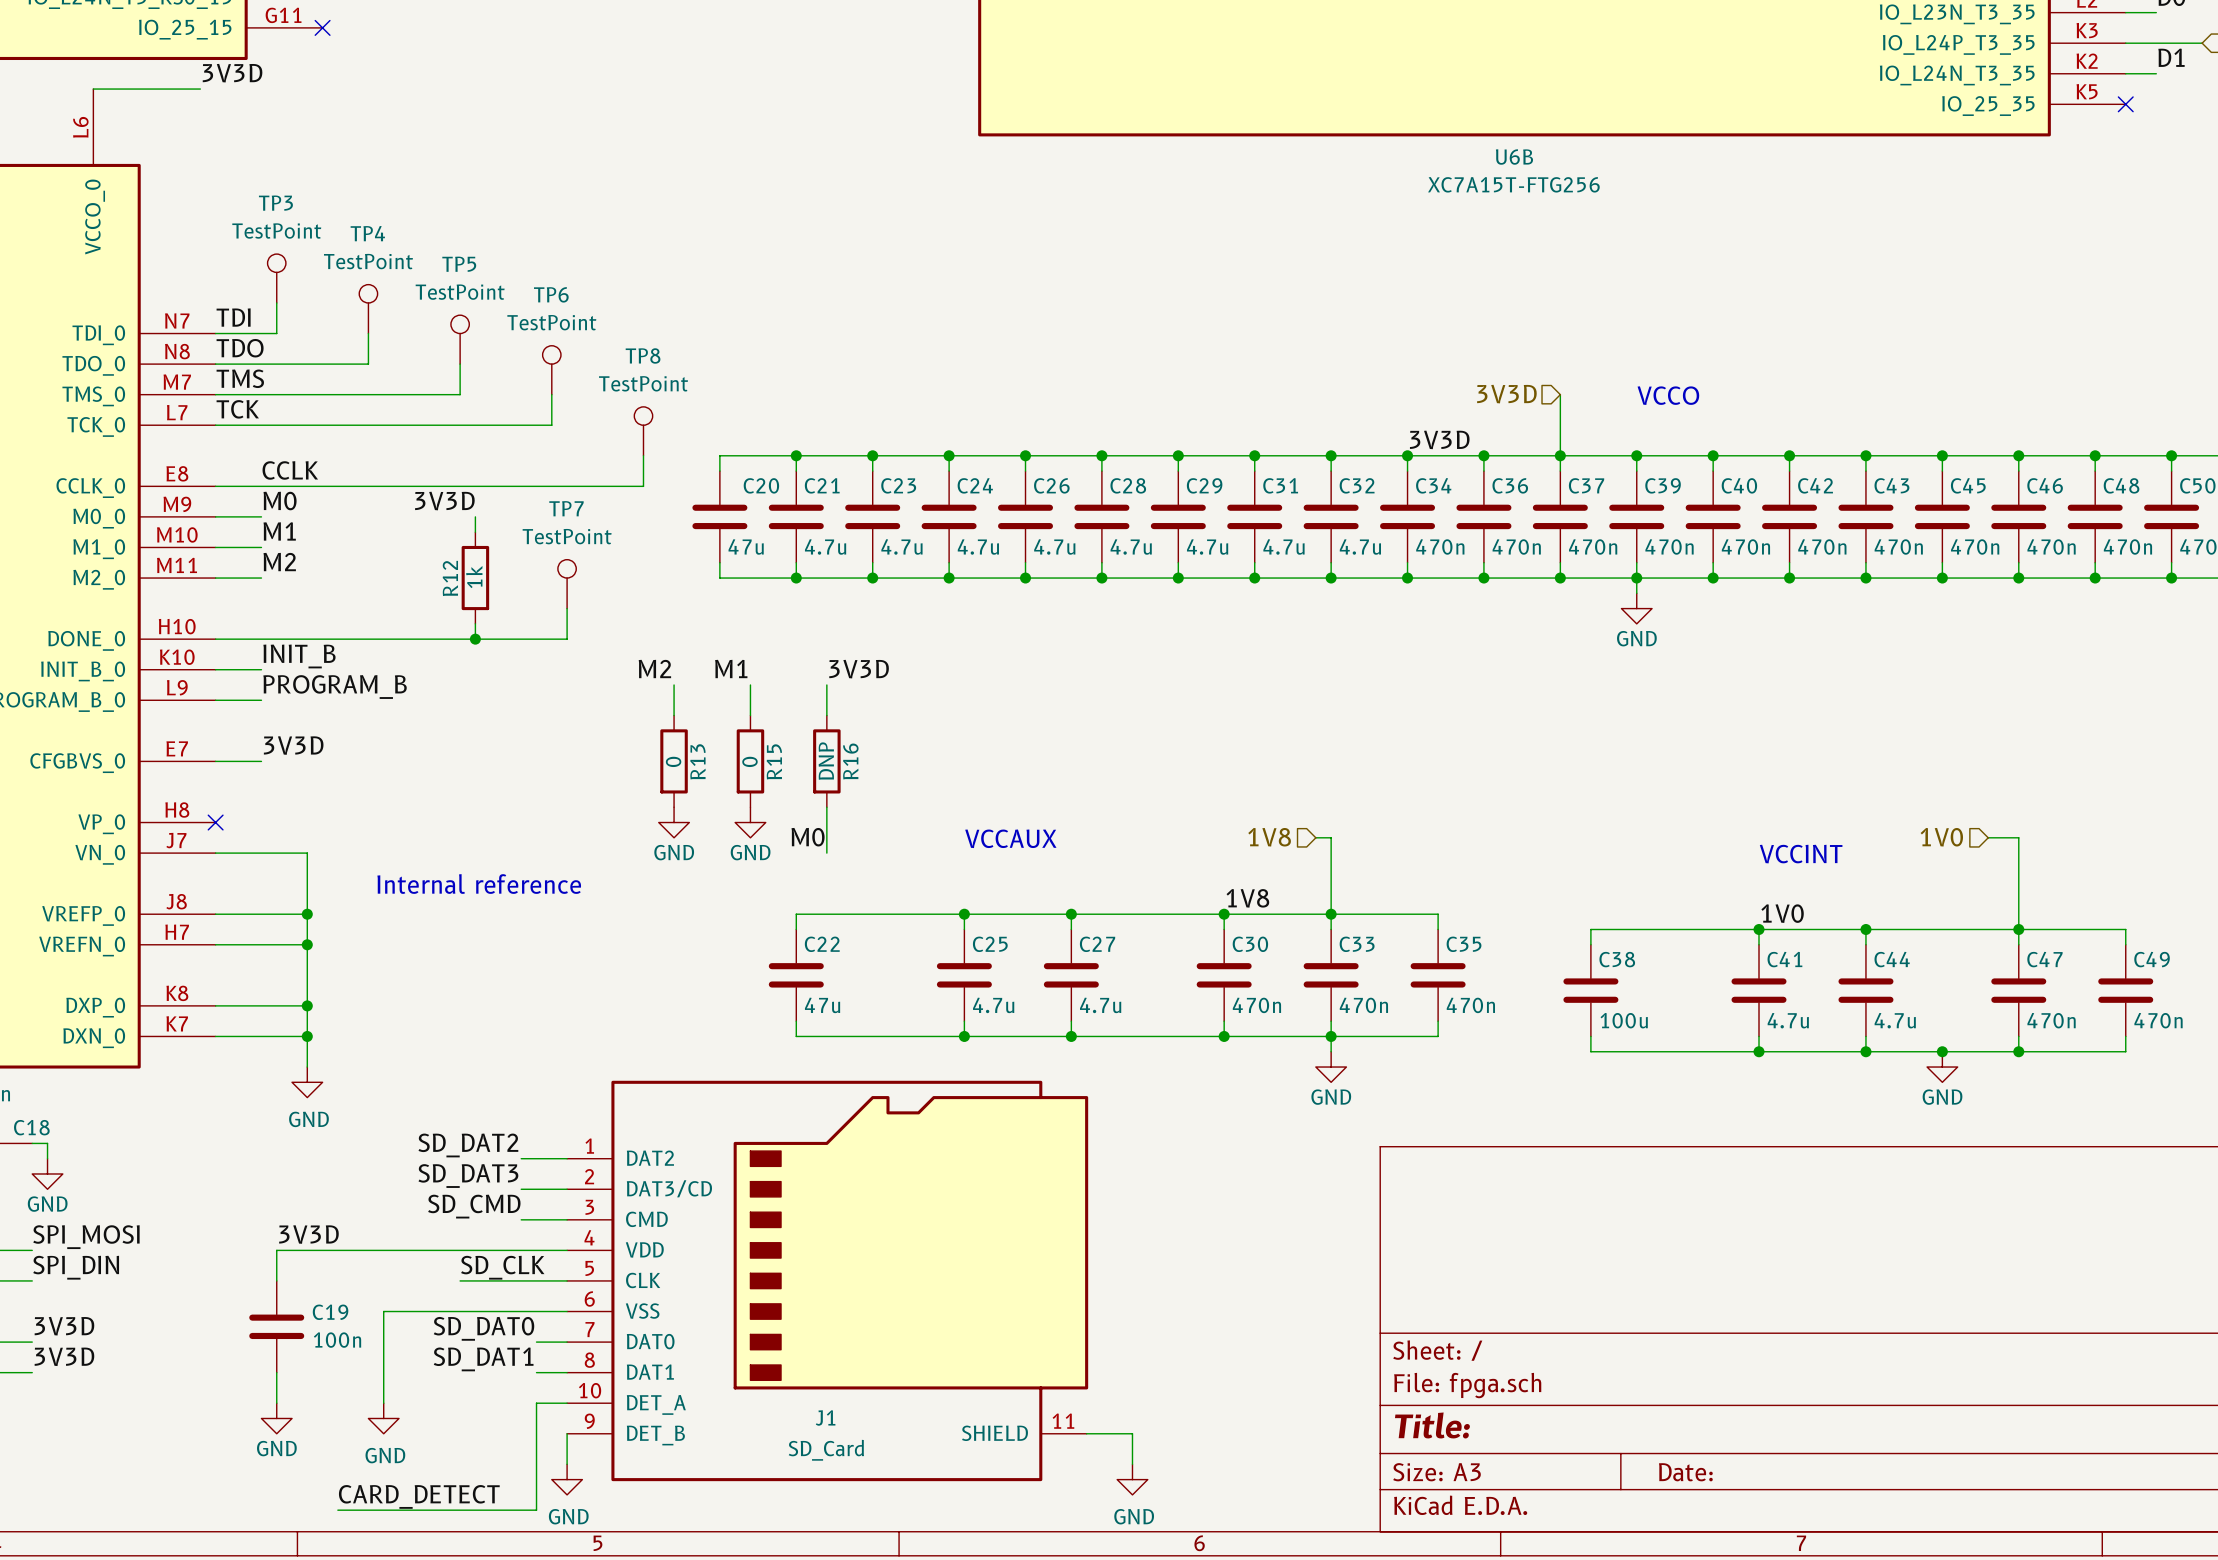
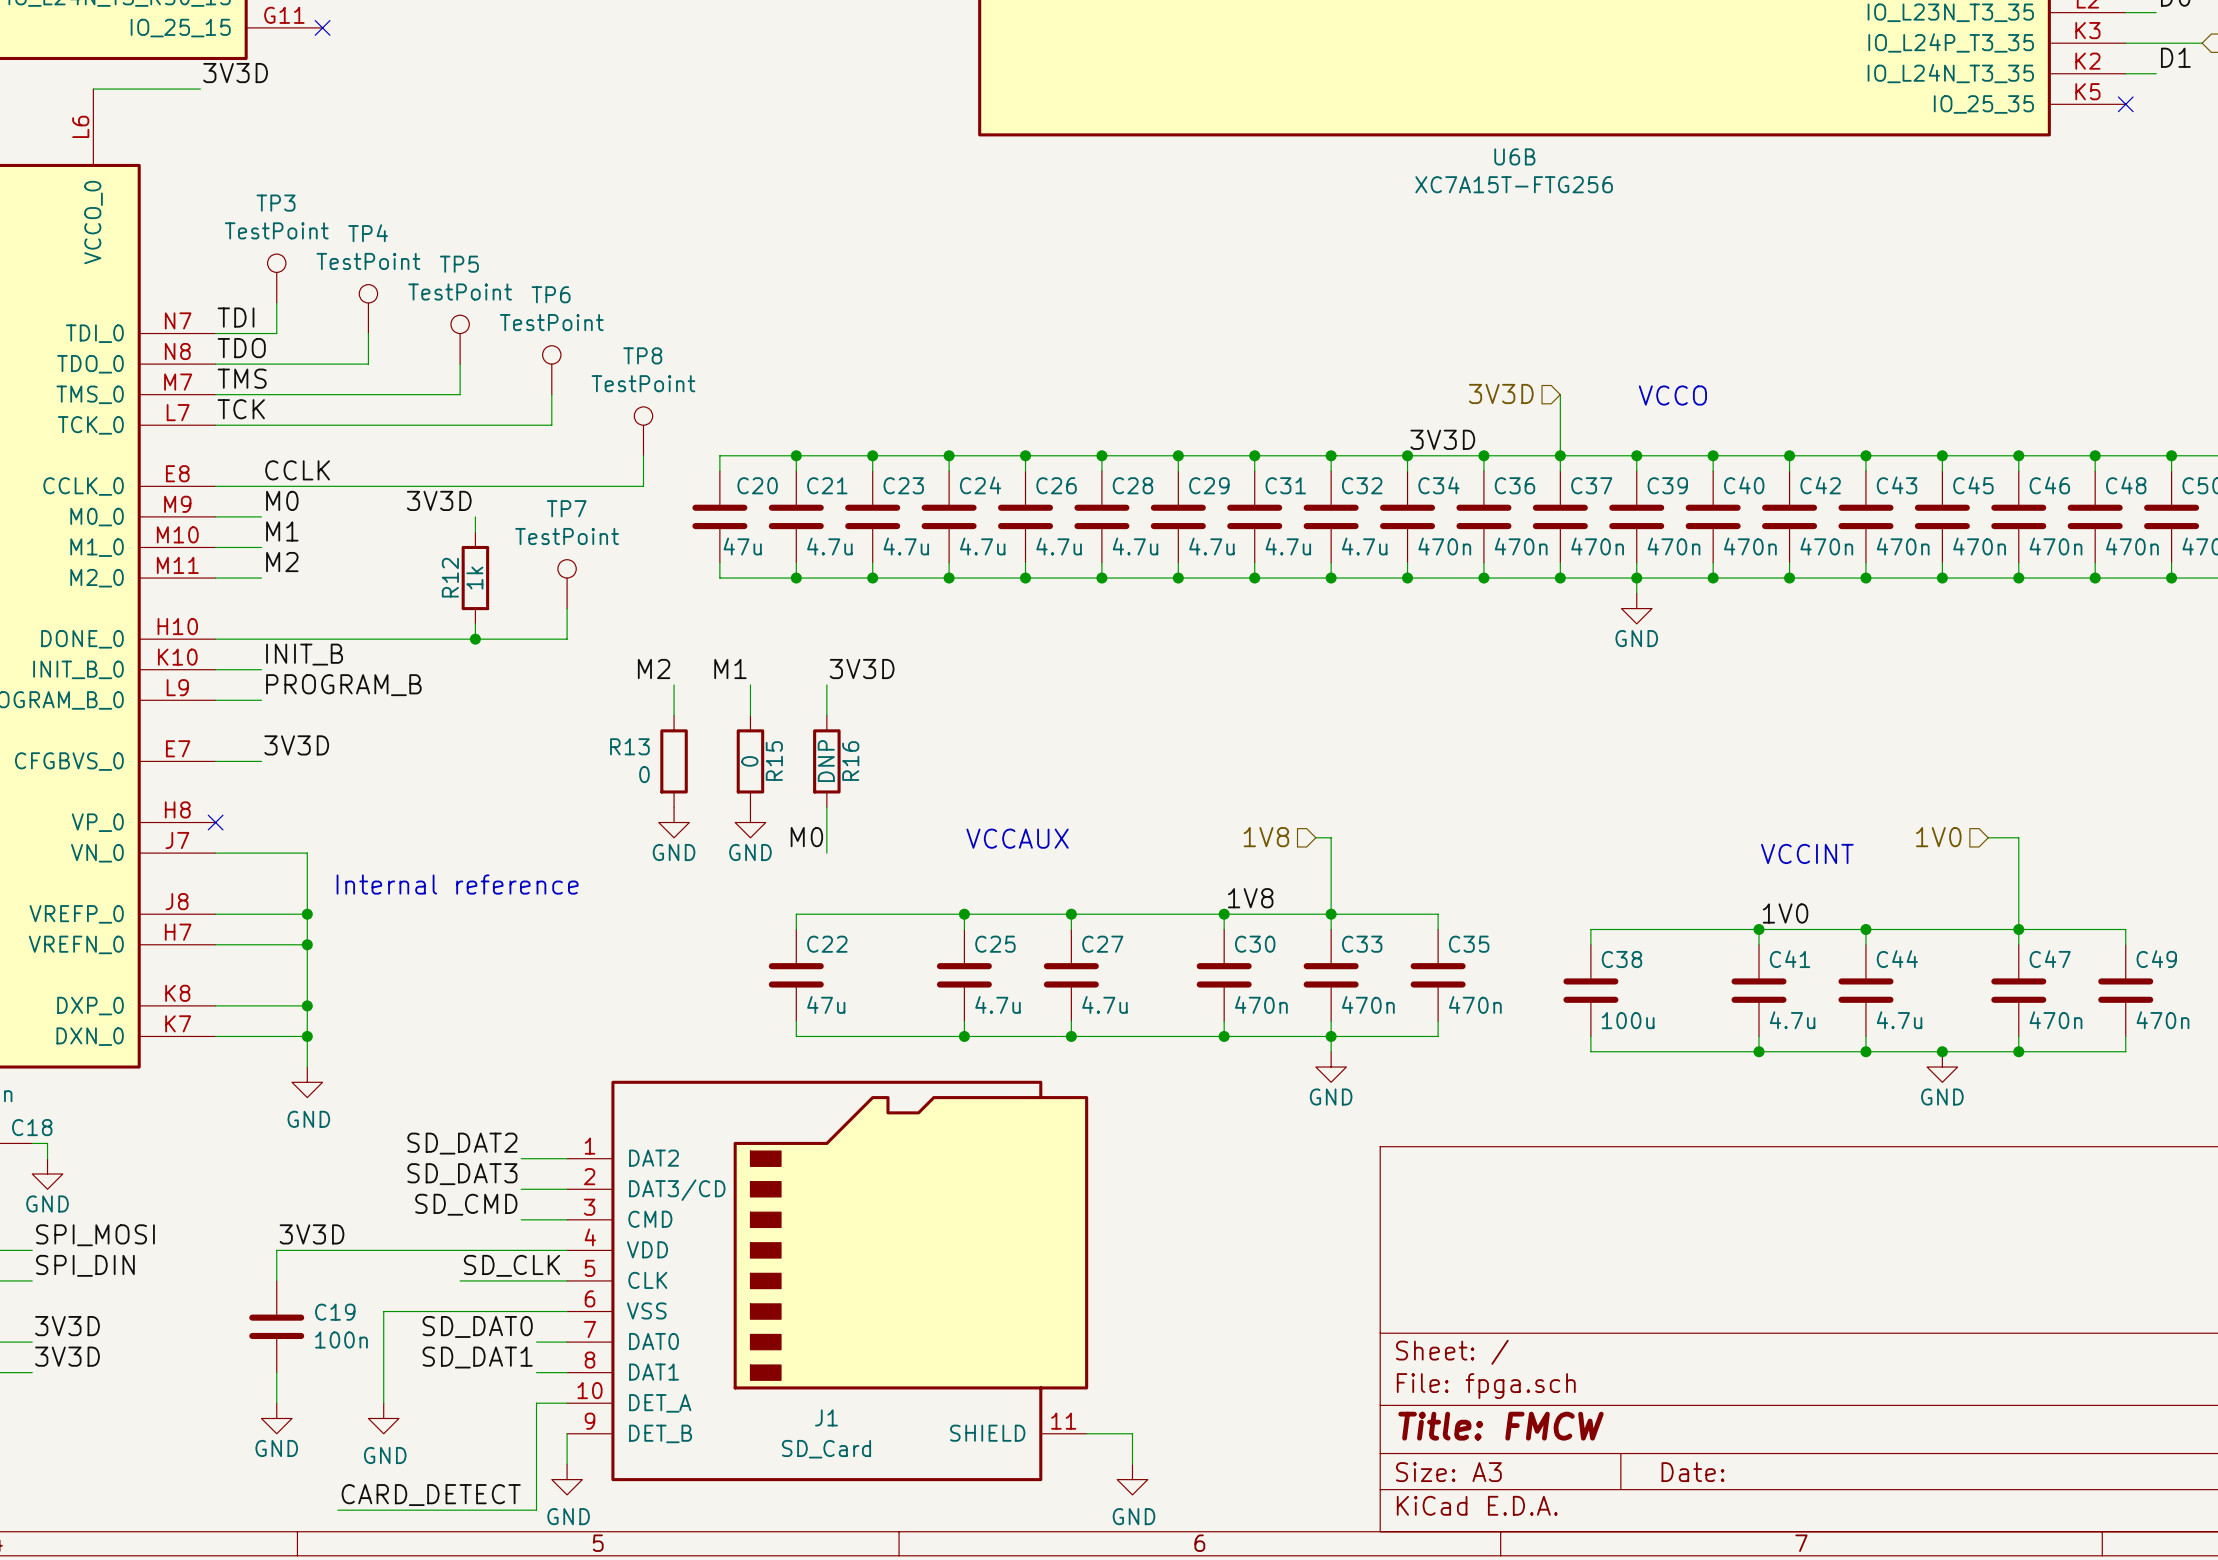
R13 value rotation: 0° (673, 761) -> 90° clockwise (644, 774)
R13 value position: 0 (673, 761) -> 0 (644, 774)
R13 name rotation: 0° (697, 761) -> 90° clockwise (629, 746)
R13 name position: R13 (697, 761) -> R13 (629, 746)
title block: Title: (1432, 1425) -> Title: FMCW (1500, 1426)

